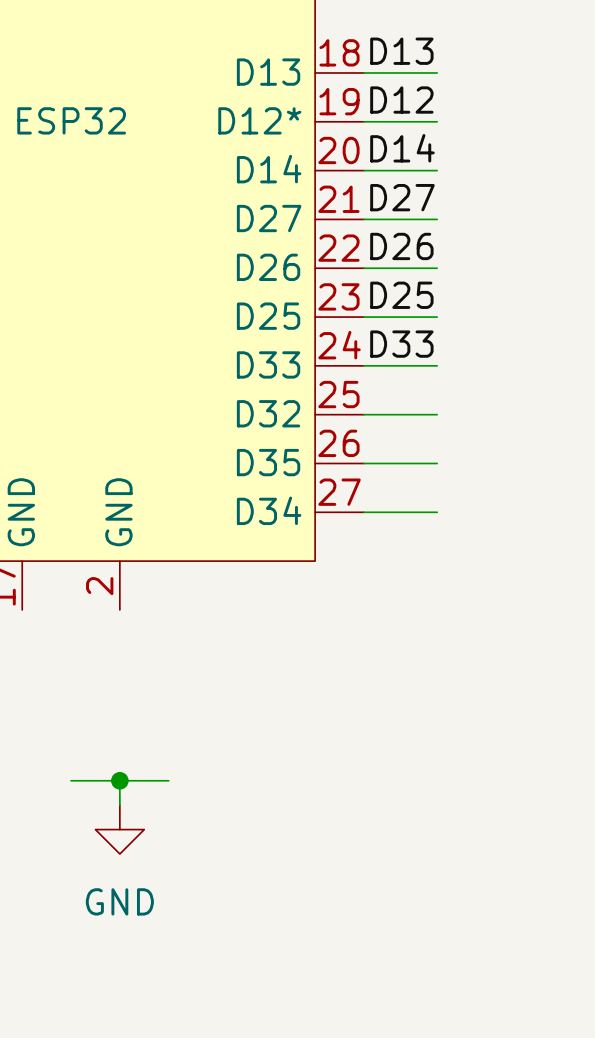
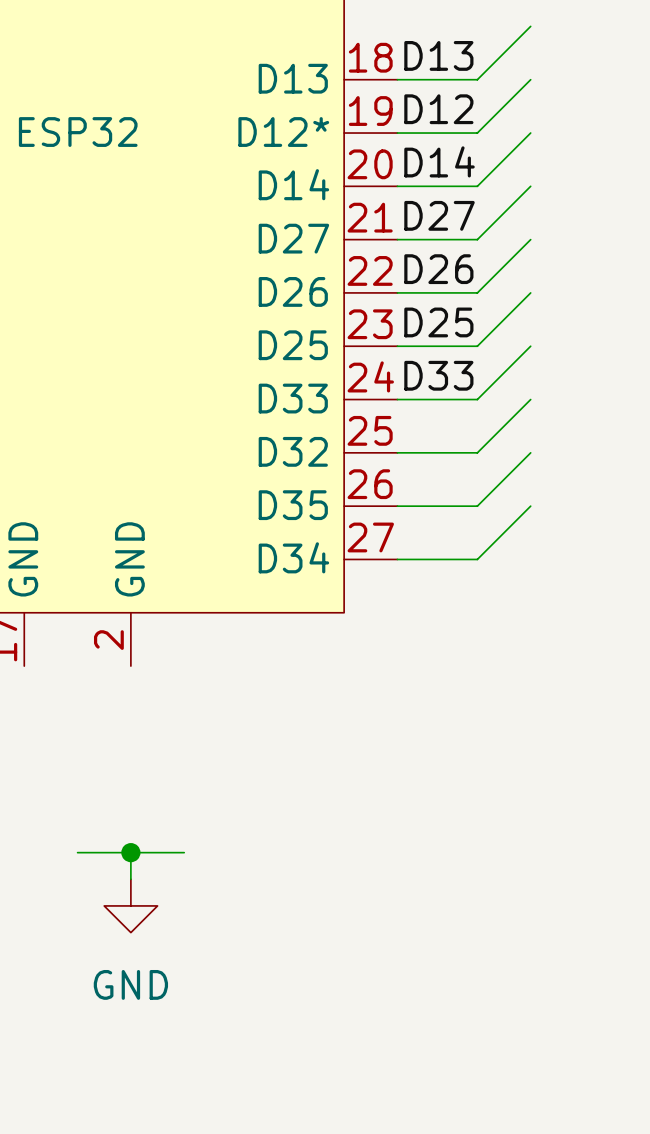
wire: none -> (530, 26) (477, 79)
wire: none -> (530, 79) (477, 133)
wire: none -> (530, 133) (477, 186)
wire: none -> (530, 186) (477, 239)
wire: none -> (530, 239) (477, 292)
wire: none -> (530, 292) (477, 346)
wire: none -> (530, 346) (477, 399)
wire: none -> (530, 399) (477, 452)
wire: none -> (530, 452) (477, 506)
wire: none -> (530, 506) (477, 559)

